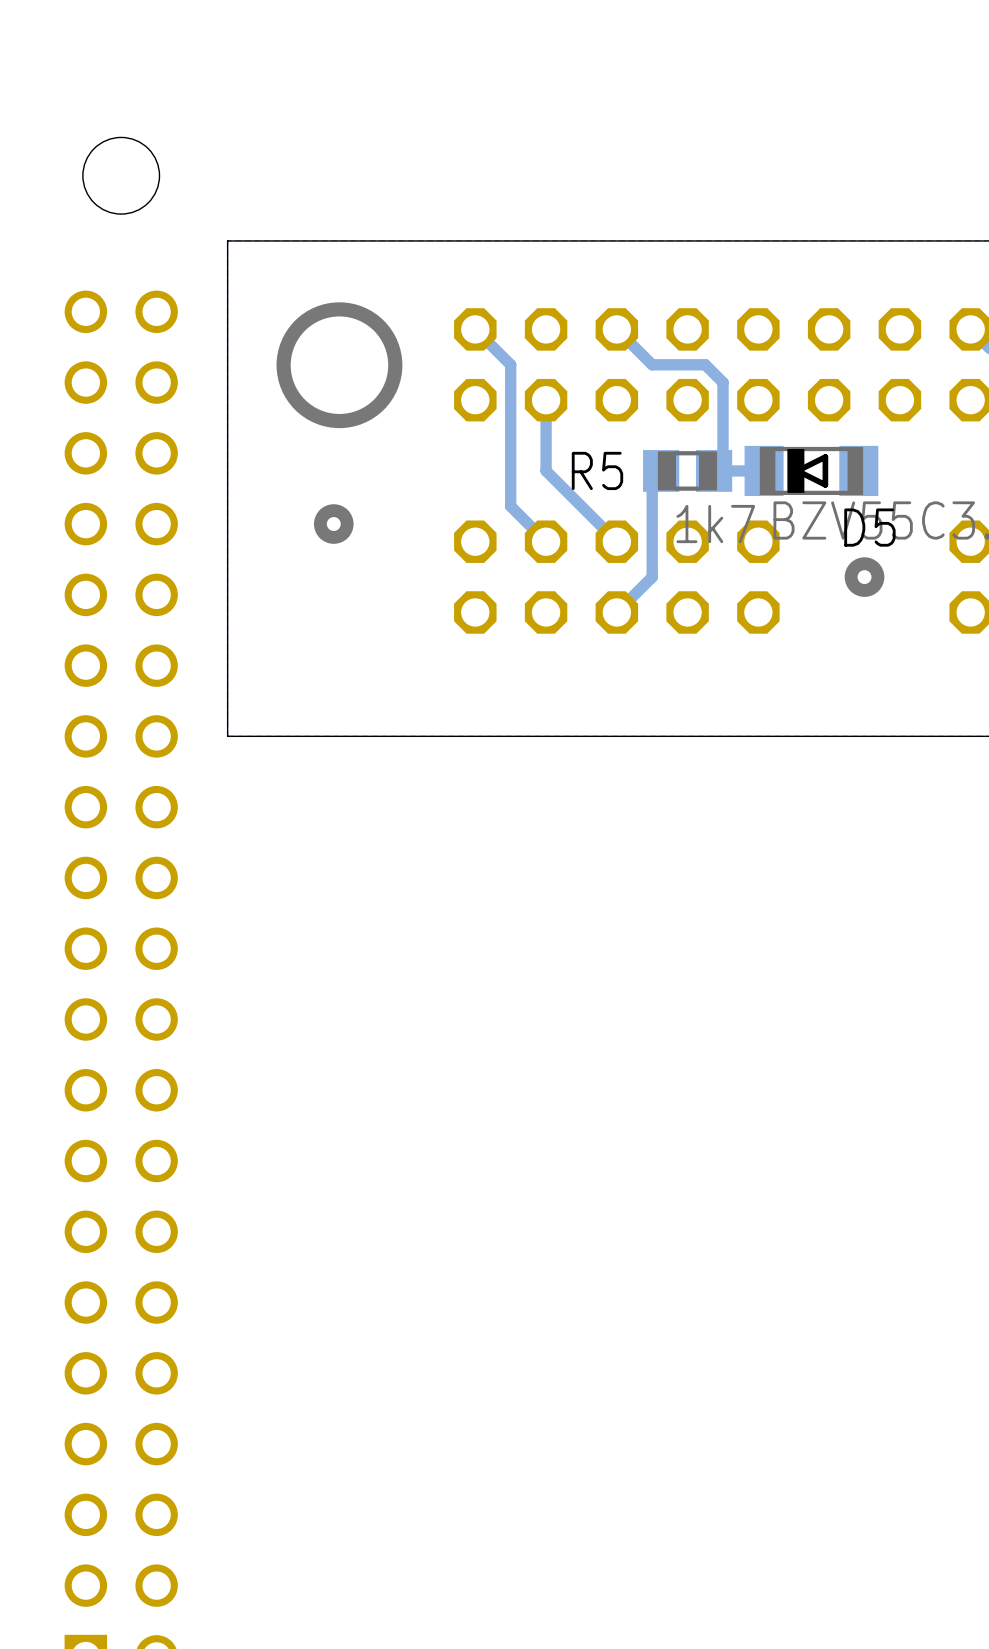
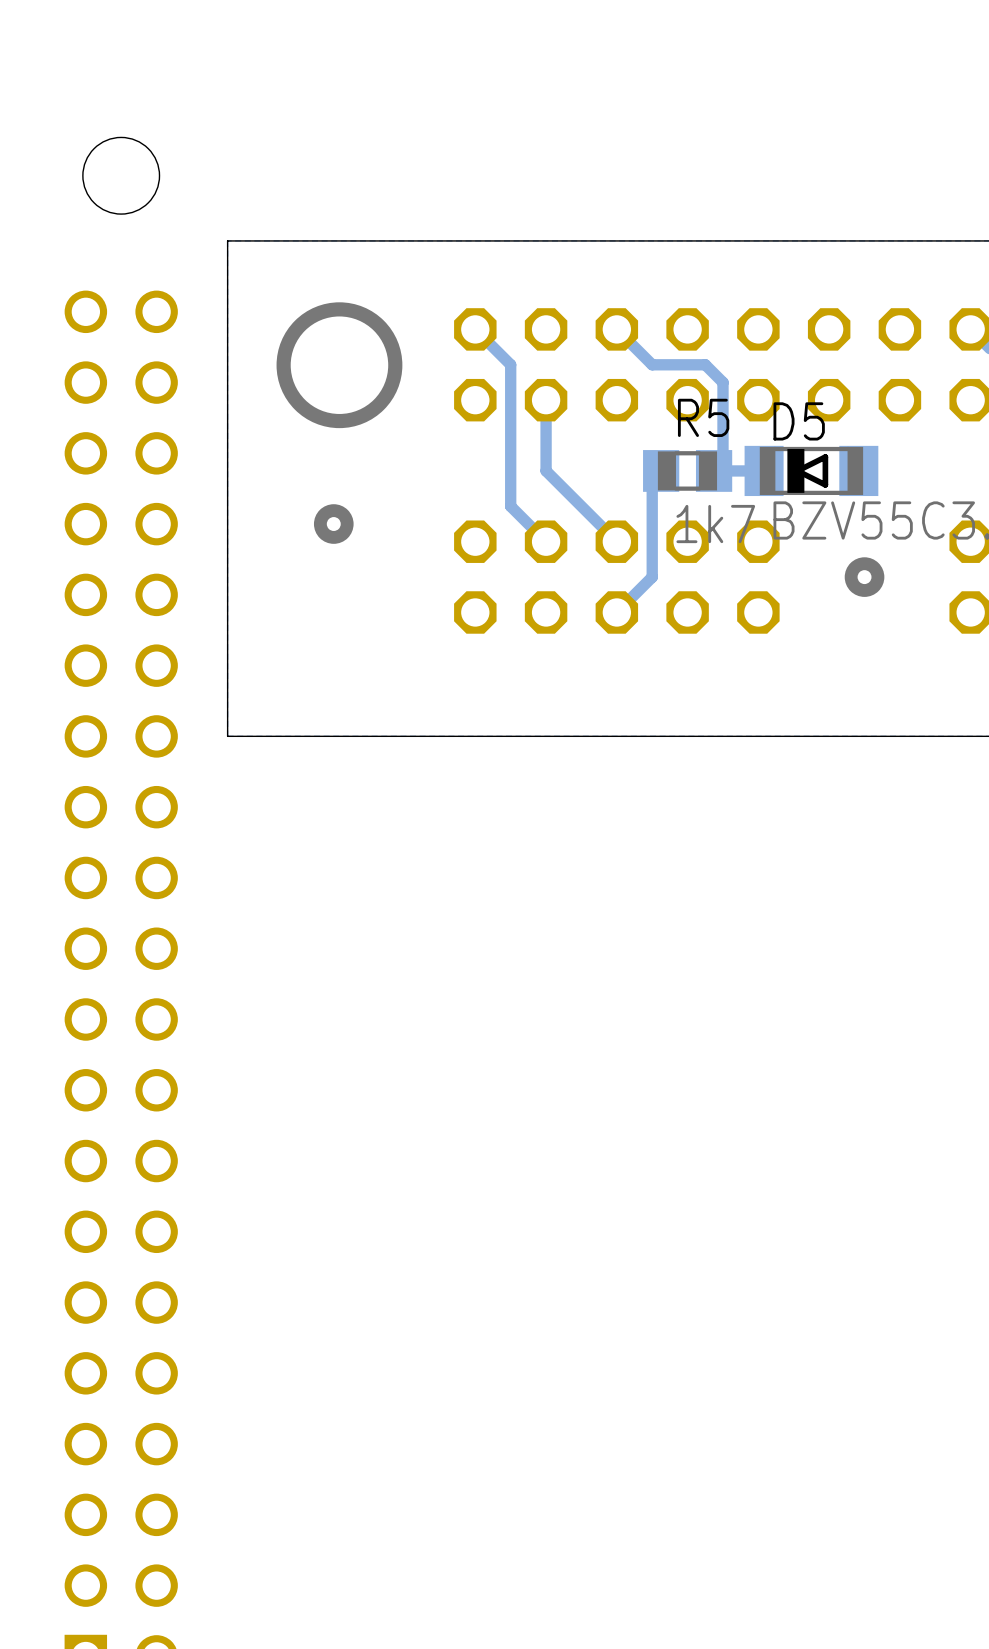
R5 name position: R5 (597, 470) -> R5 (703, 417)
D5 name position: D5 (869, 527) -> D5 (799, 421)

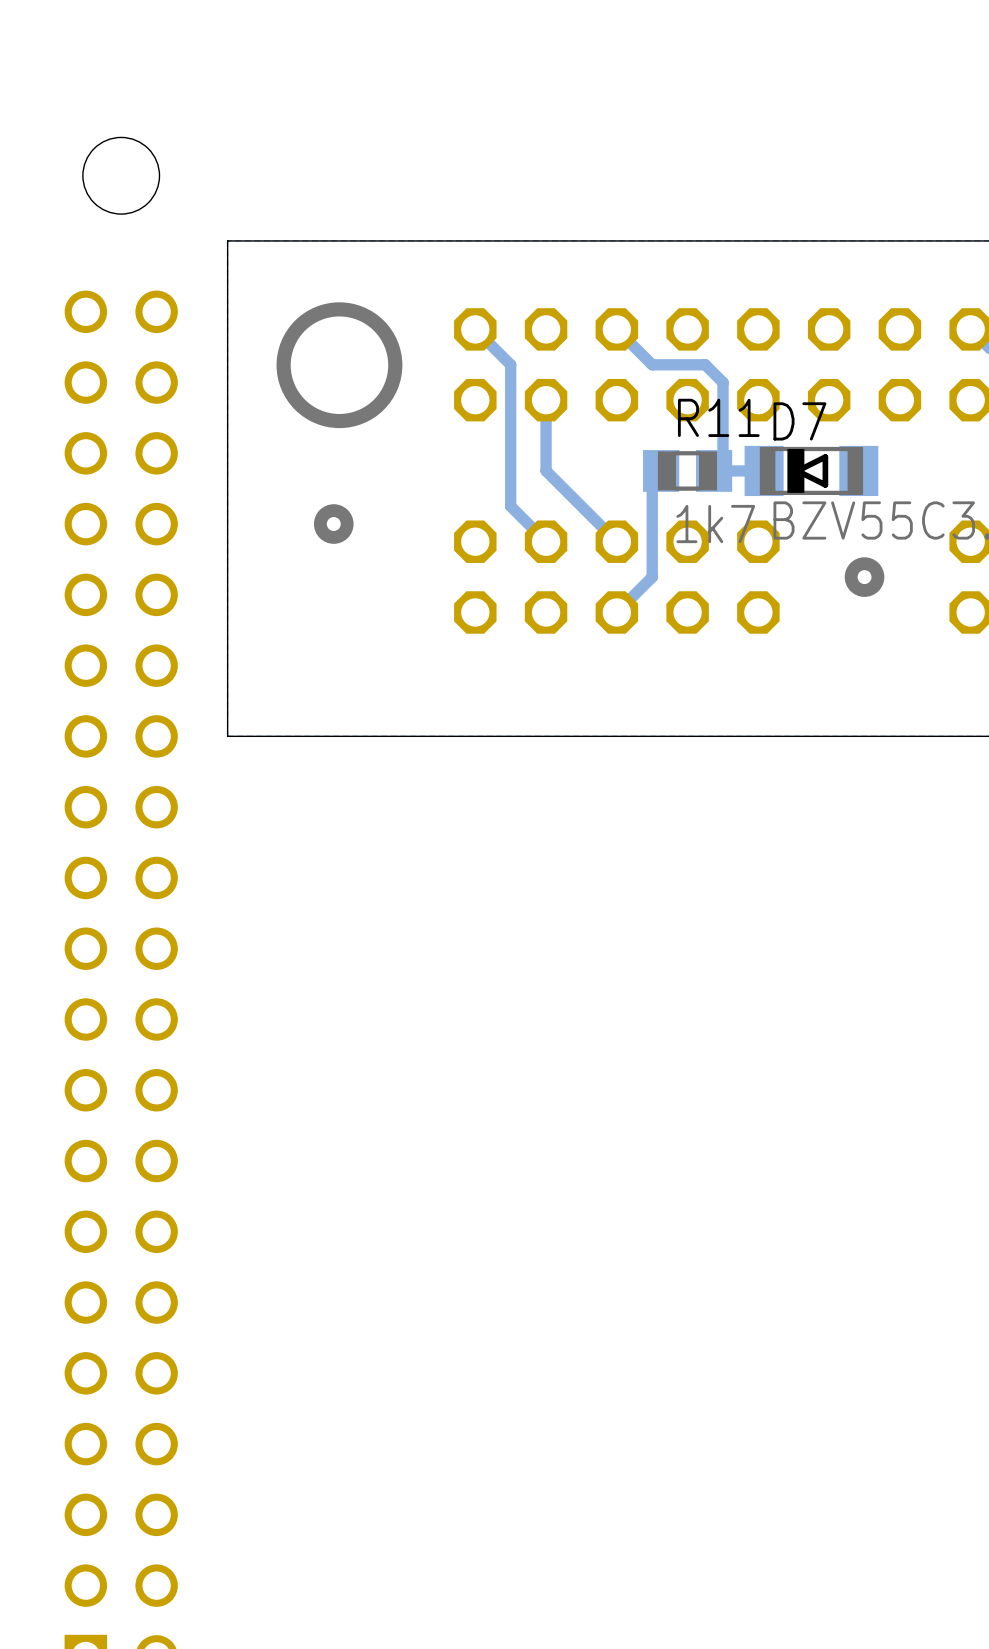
R5 name: R5 (703, 417) -> R11 (718, 417)
D5 name: D5 (799, 421) -> D7 (799, 421)

